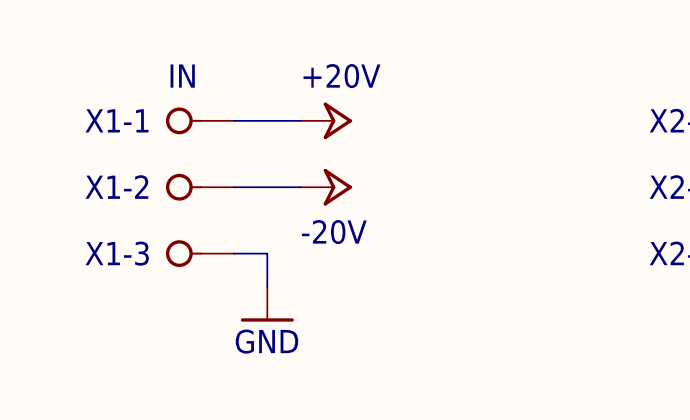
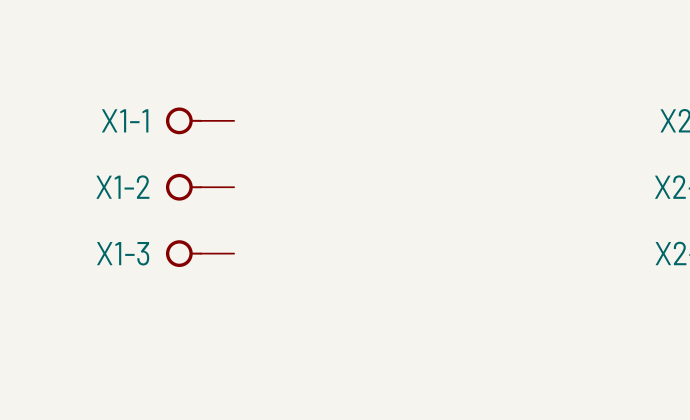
X1-3 value: IN (182, 76) -> none
wire: (234, 120) (300, 120) -> none
power symbol: +20V (326, 120) -> none
wire: (234, 187) (300, 187) -> none
power symbol: -20V (326, 187) -> none
wire: (234, 253) (267, 253) (267, 286) -> none
power symbol: GND (267, 304) -> none

